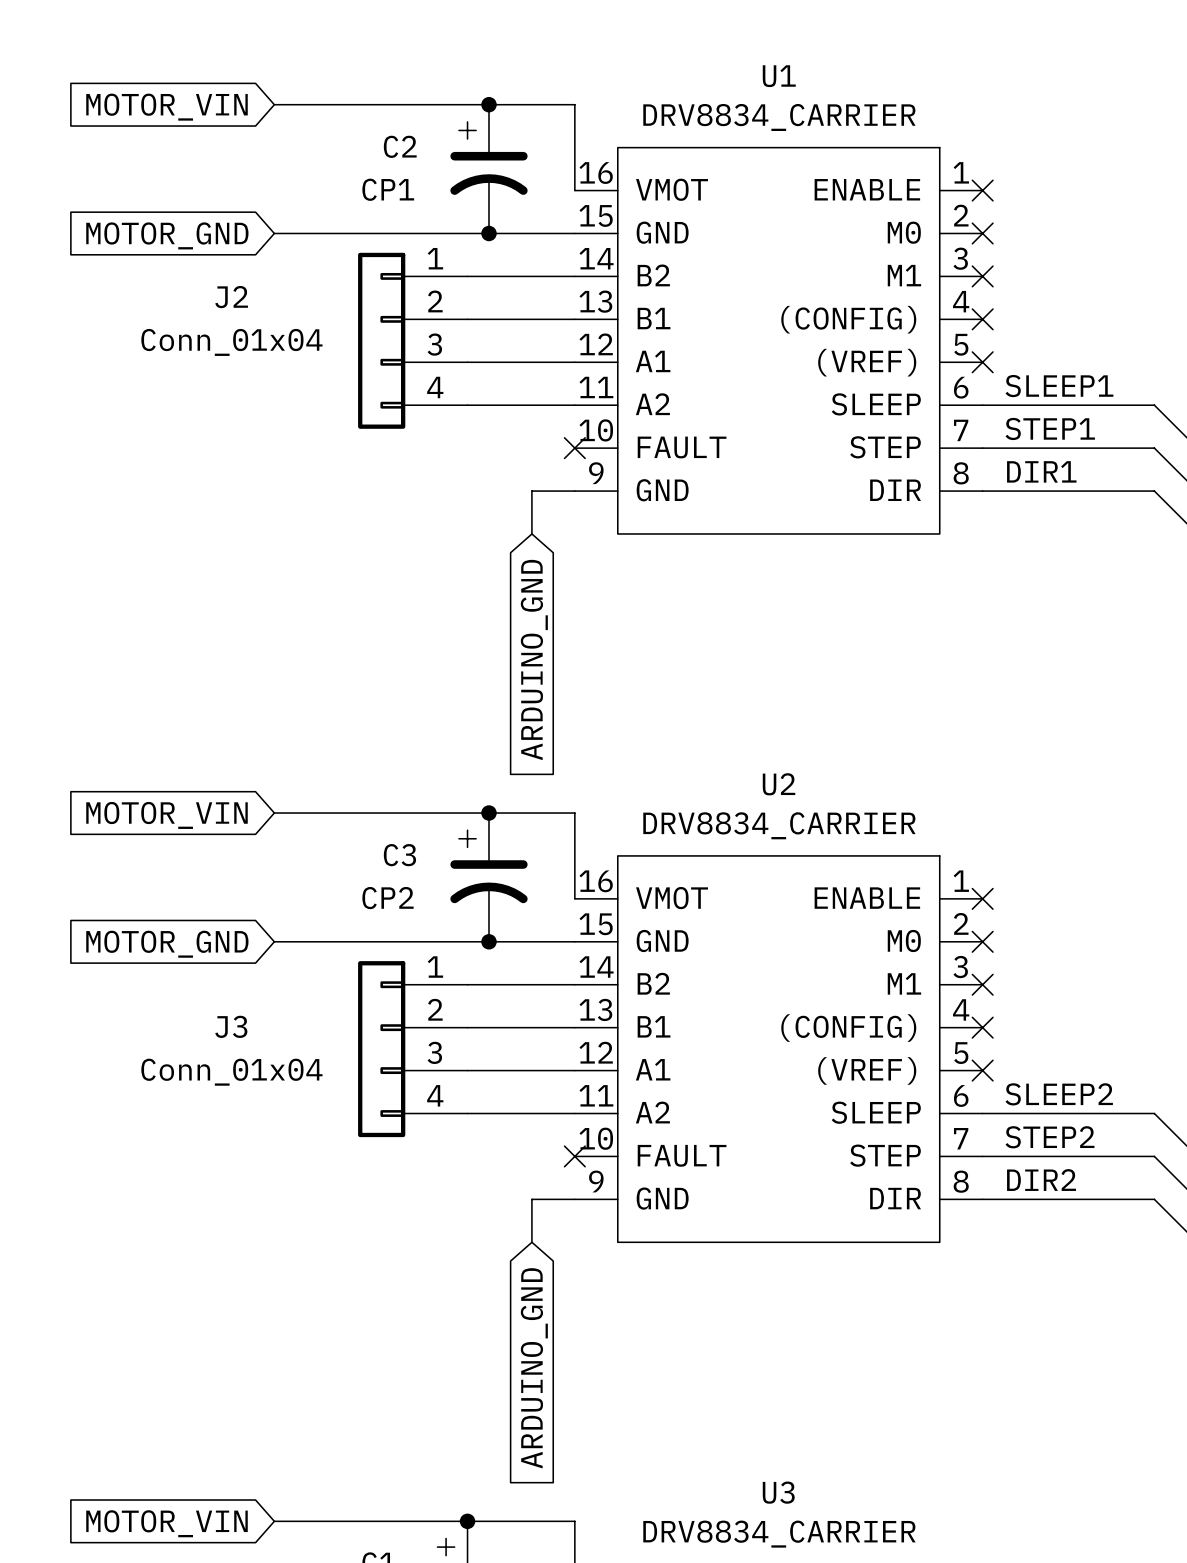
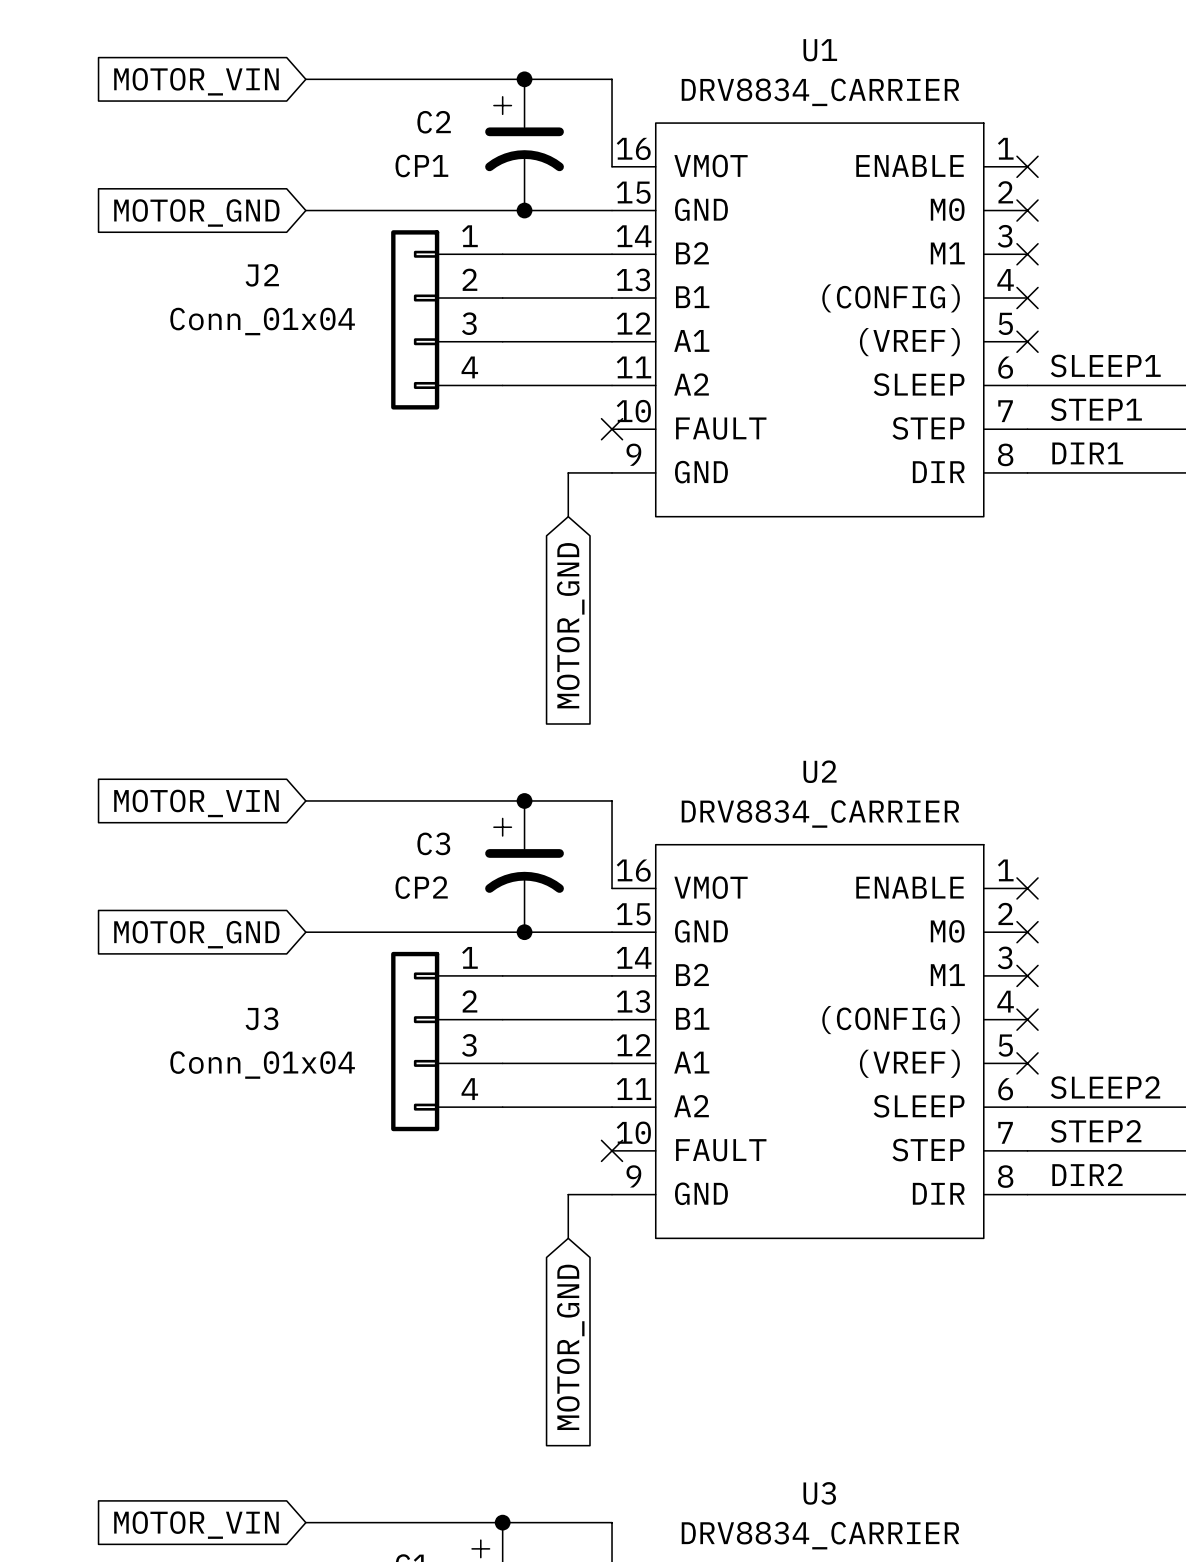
global label: ARDUINO_GND (534, 660) -> MOTOR_GND (570, 625)
global label: ARDUINO_GND (534, 1368) -> MOTOR_GND (570, 1347)

